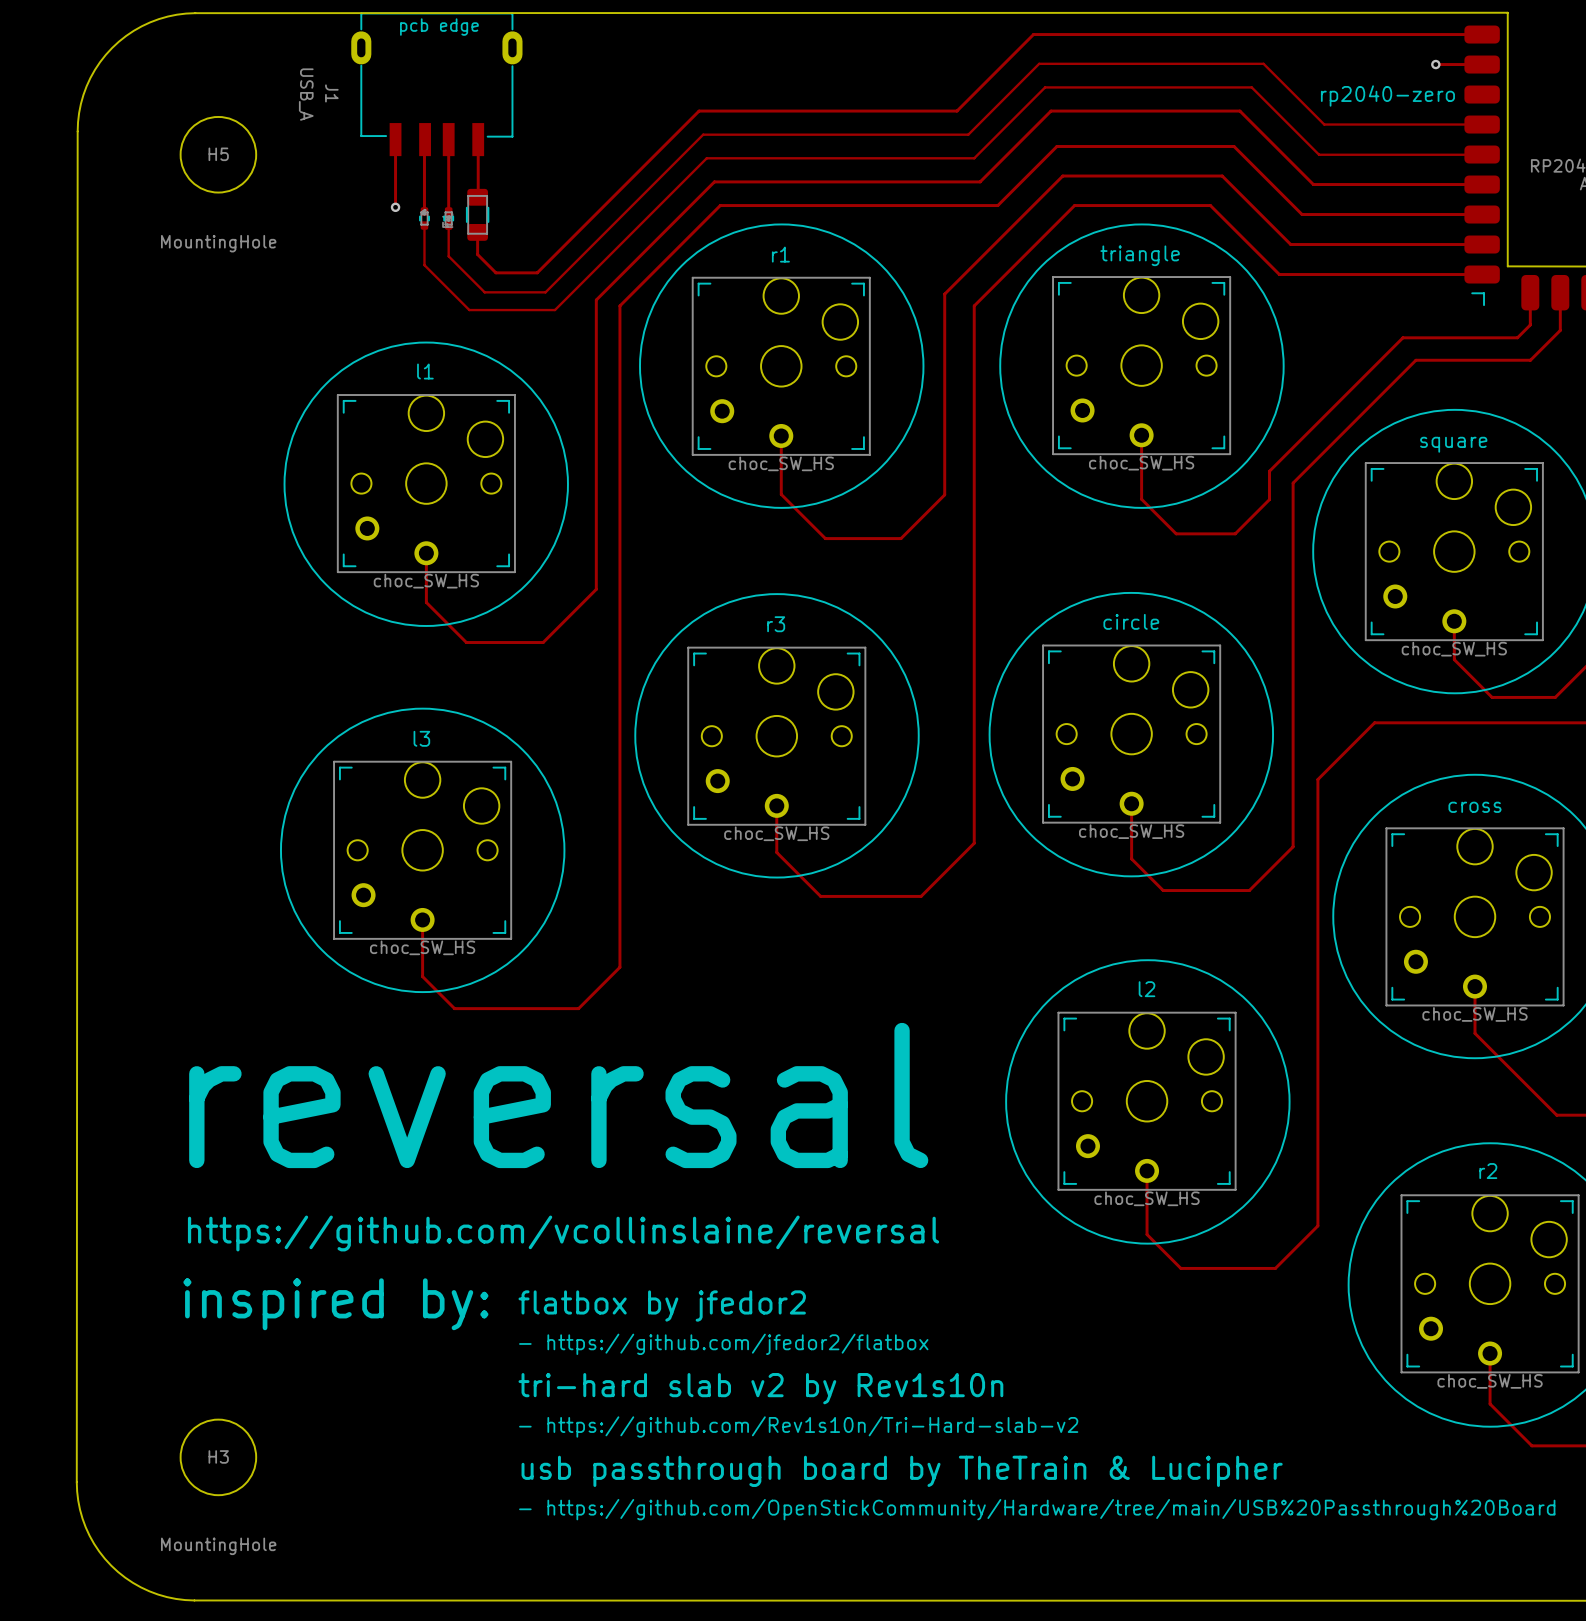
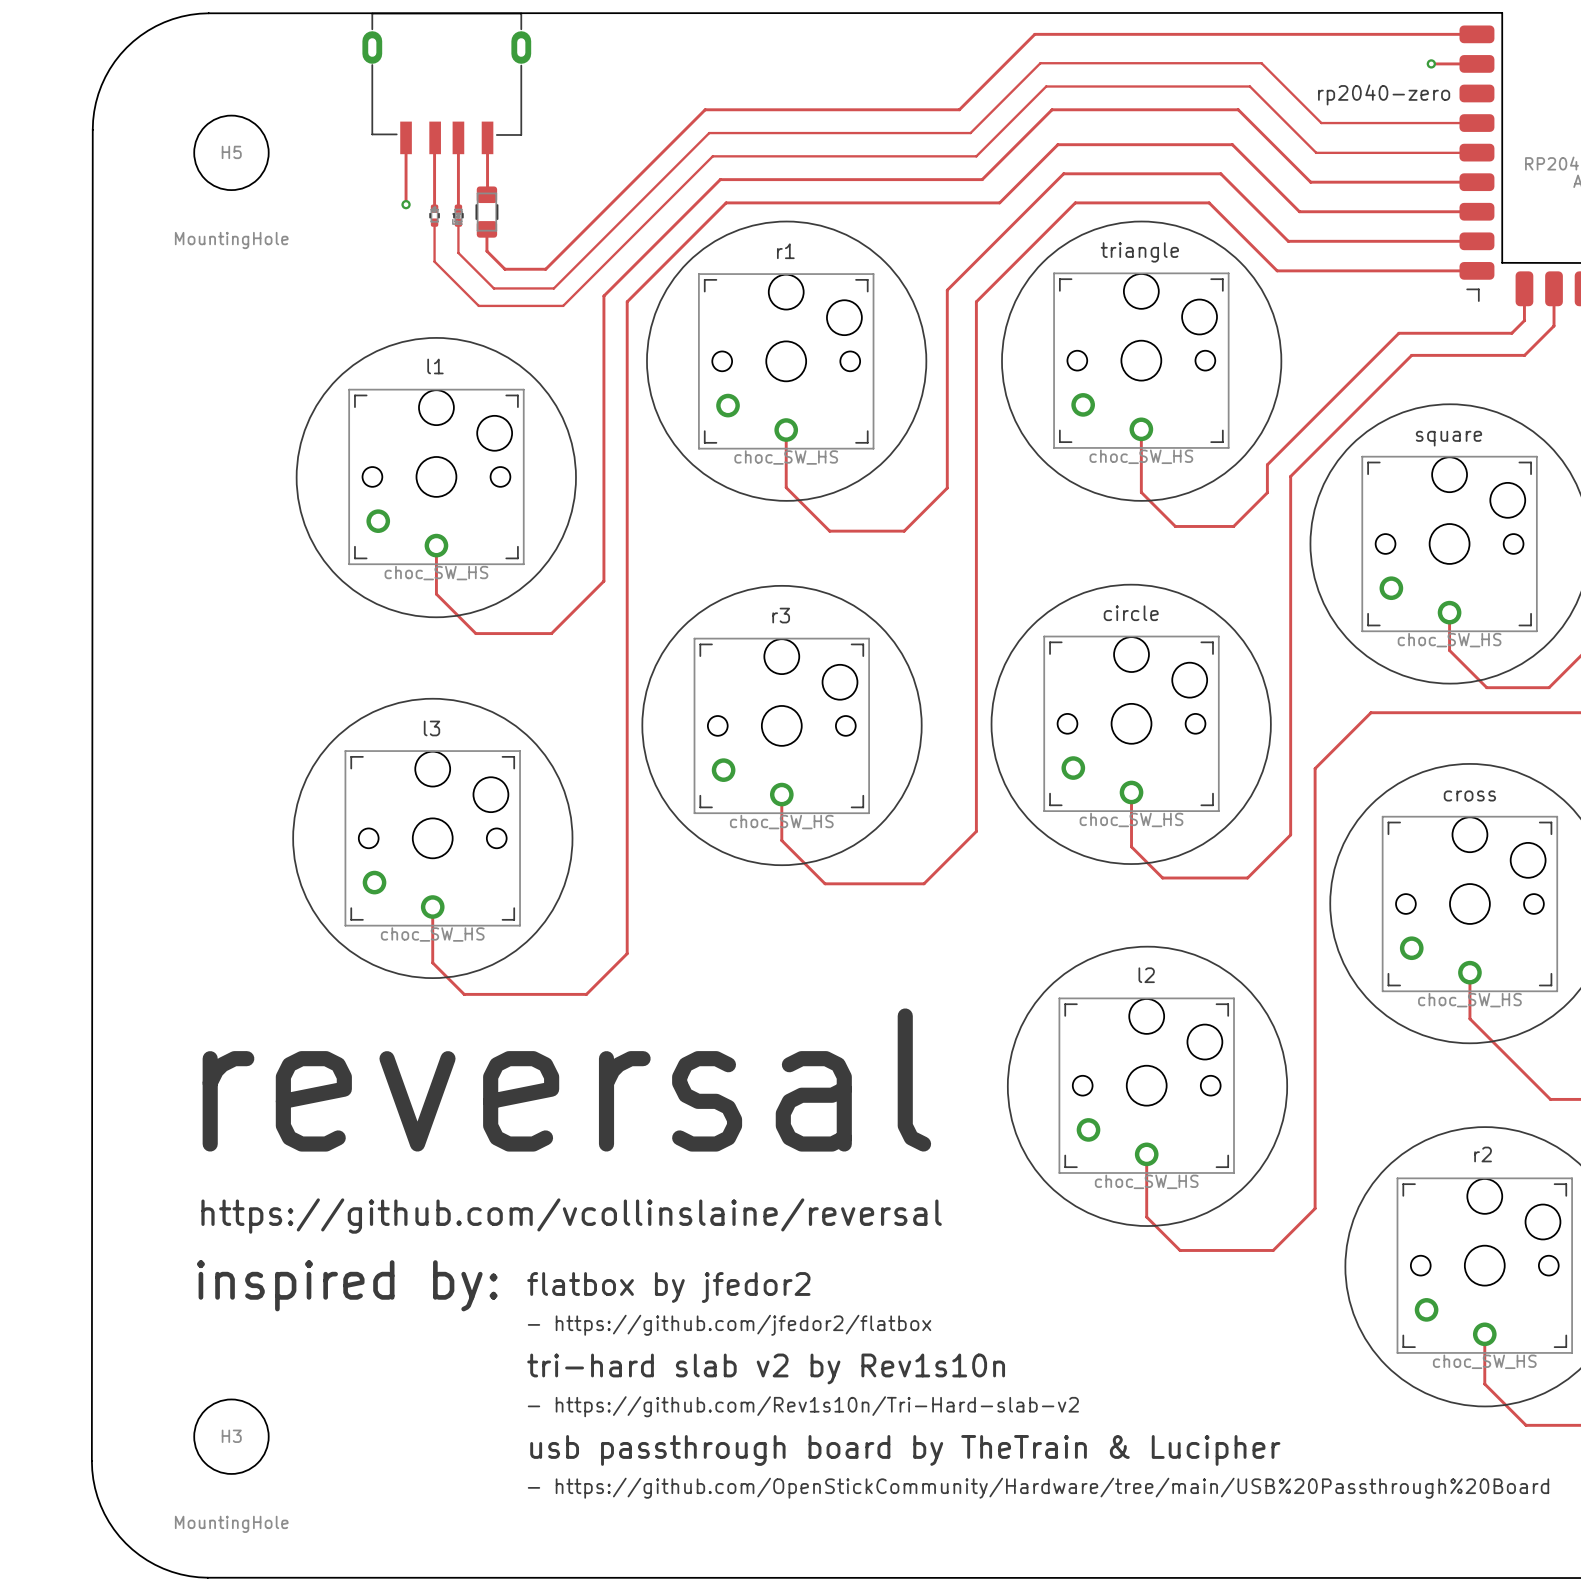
J1 text: pcb edge (439, 27) -> none
J1 name: J1 (331, 93) -> none
J1 value: USB_A (306, 94) -> none

